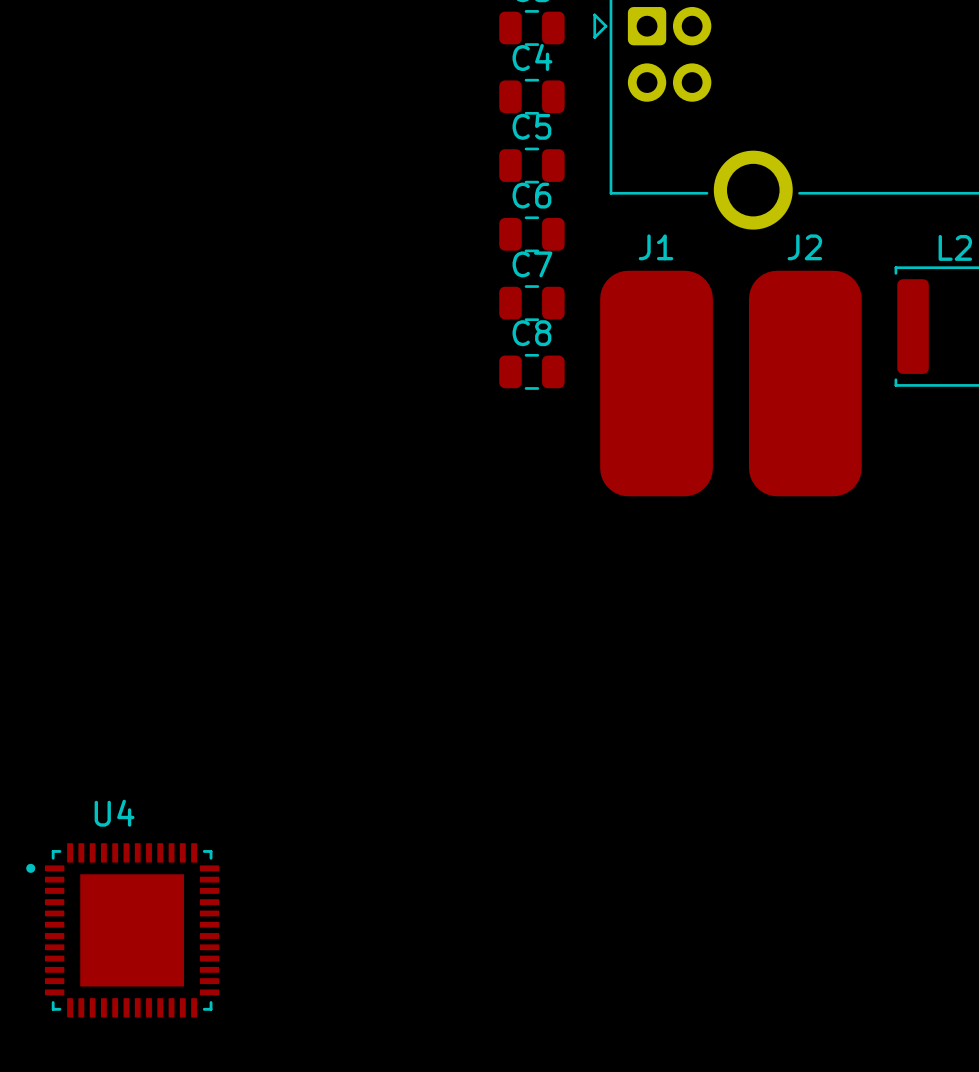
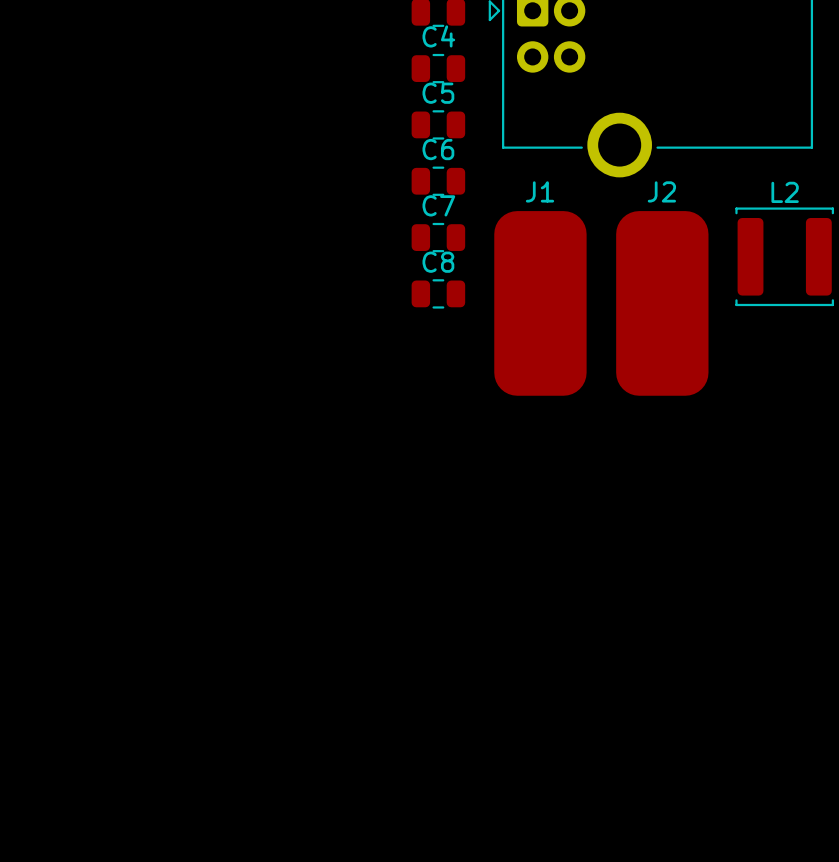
U4: (122, 930) -> none

